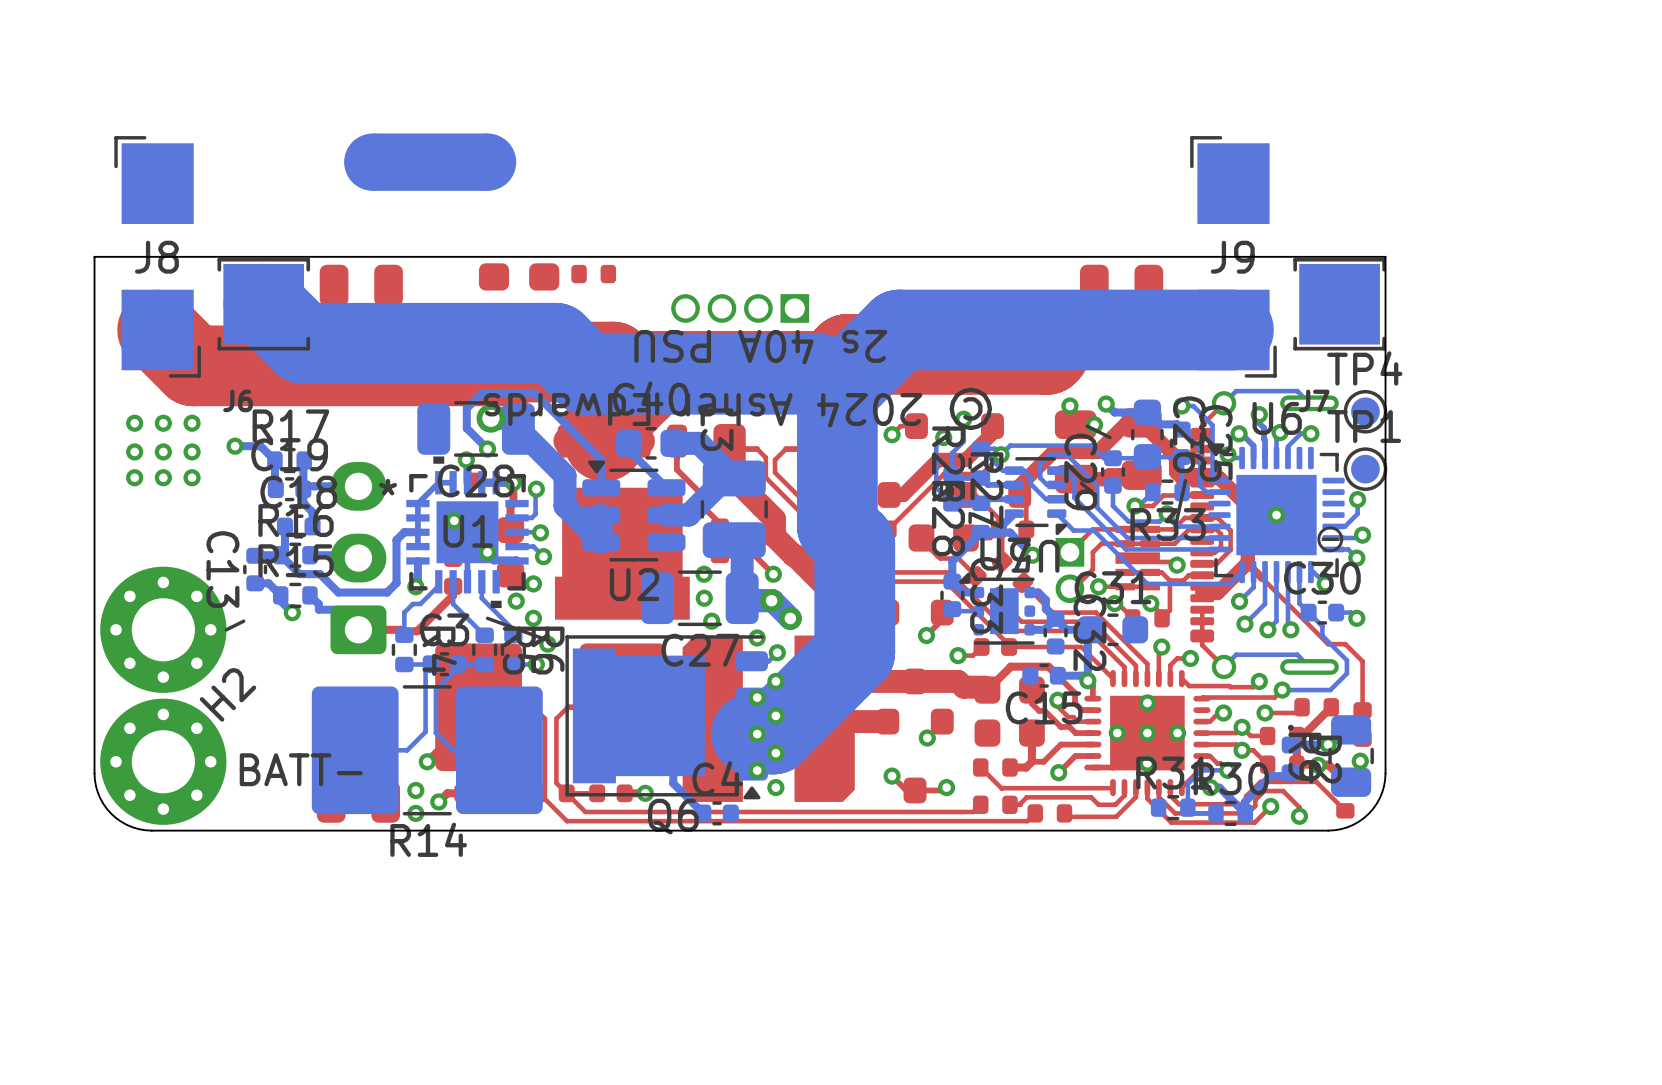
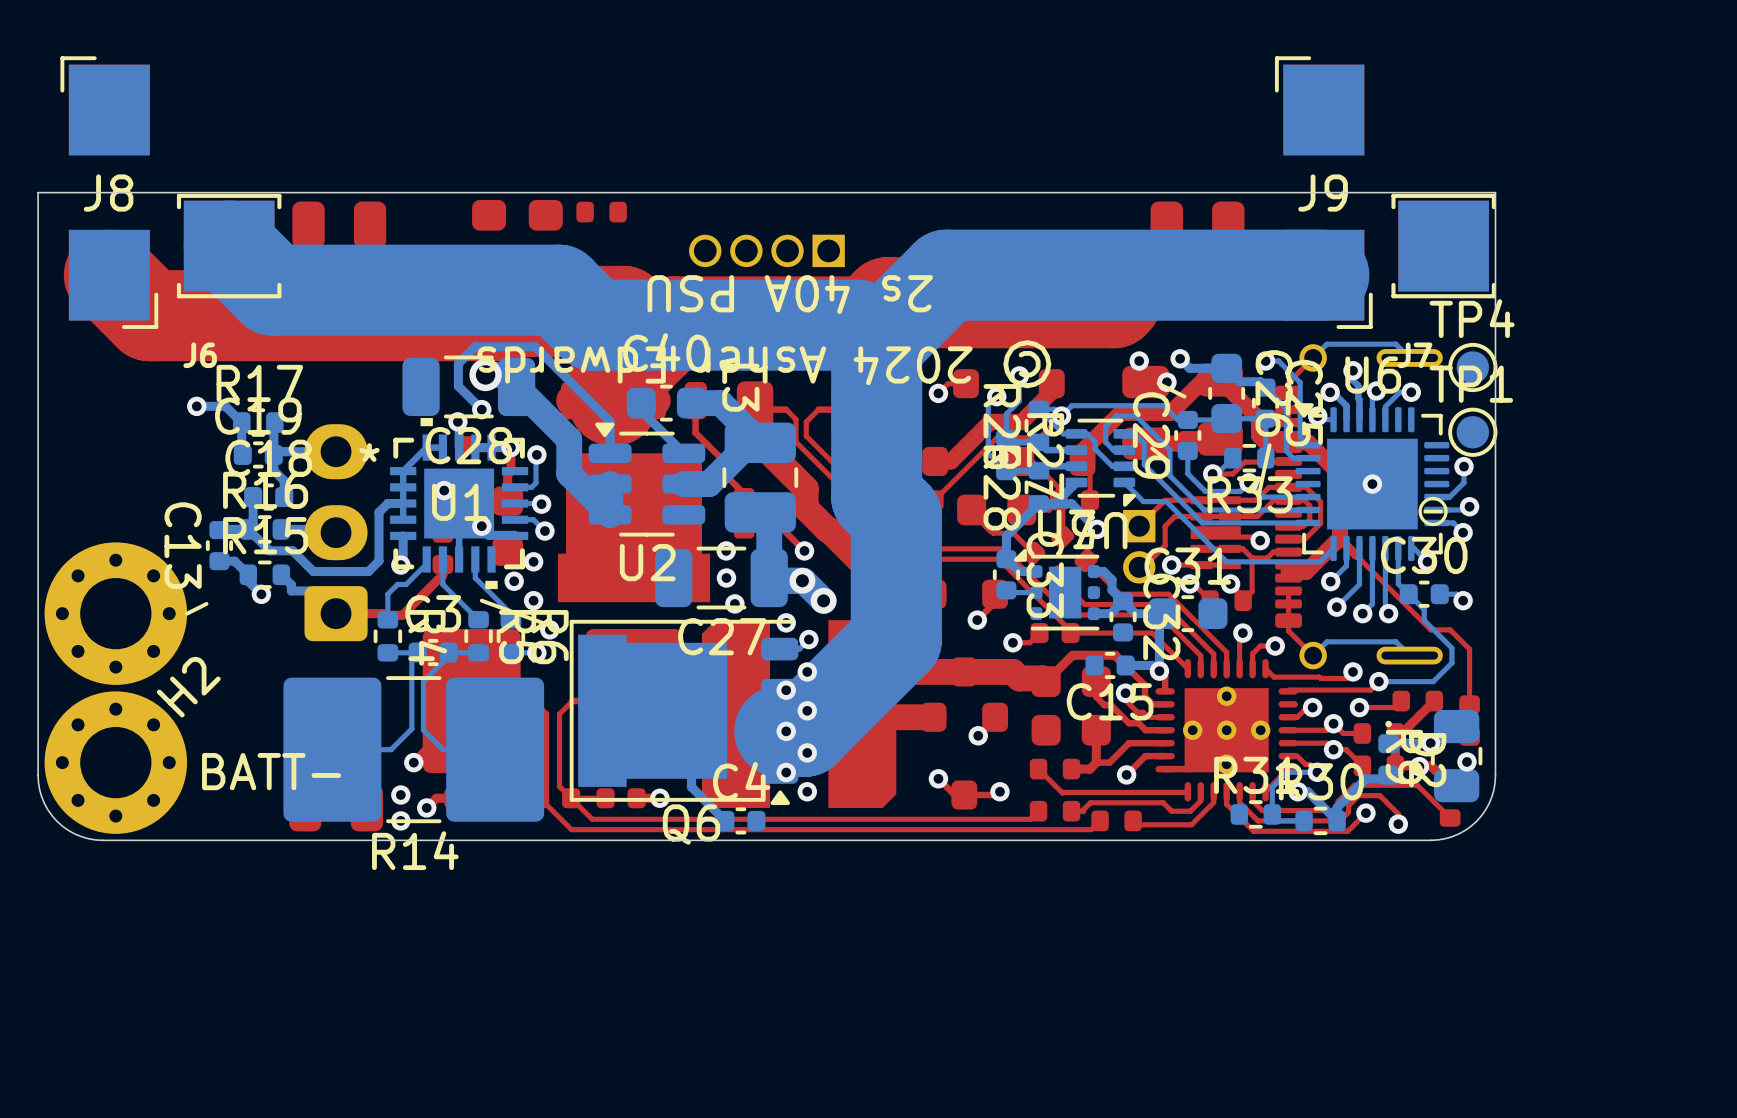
part: (430, 162) -> none
via: (134, 423) -> none
via: (163, 423) -> none
via: (192, 423) -> none
via: (134, 451) -> none
via: (163, 451) -> none
via: (192, 451) -> none
via: (134, 477) -> none
via: (163, 477) -> none
via: (192, 477) -> none

